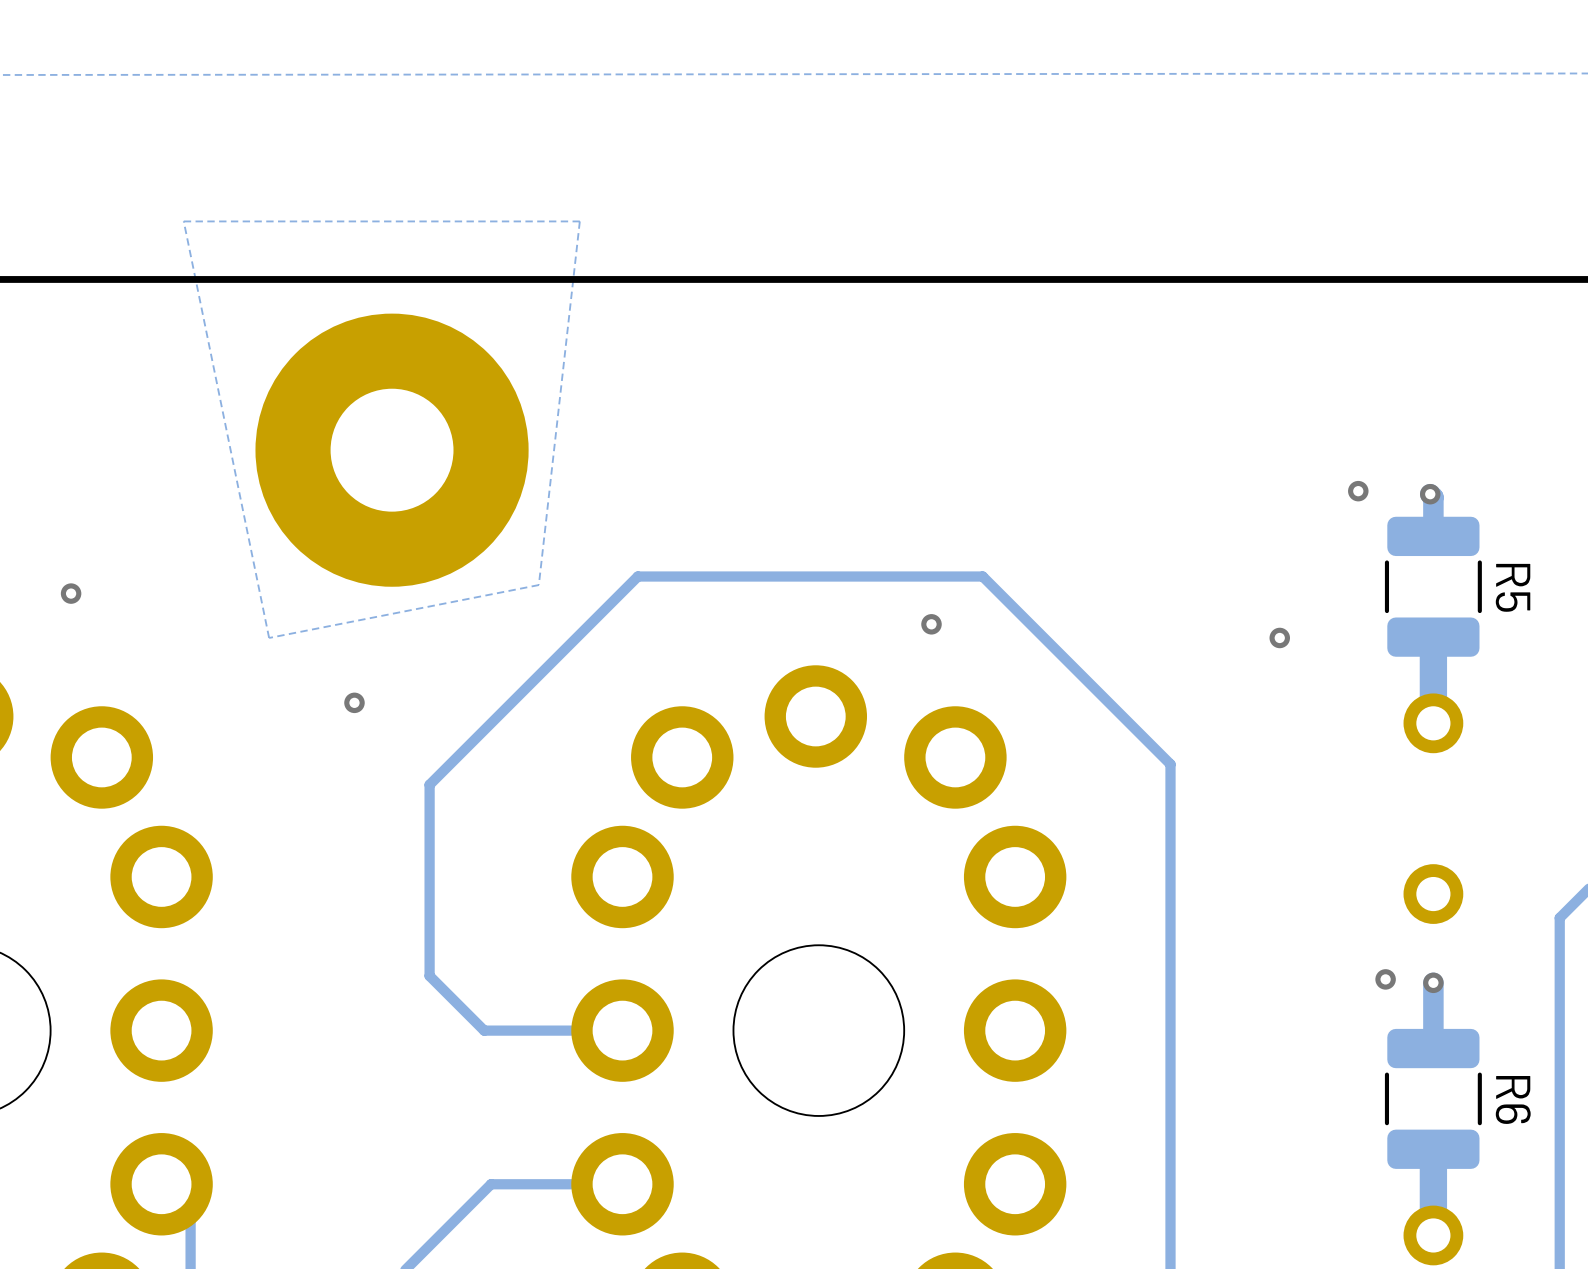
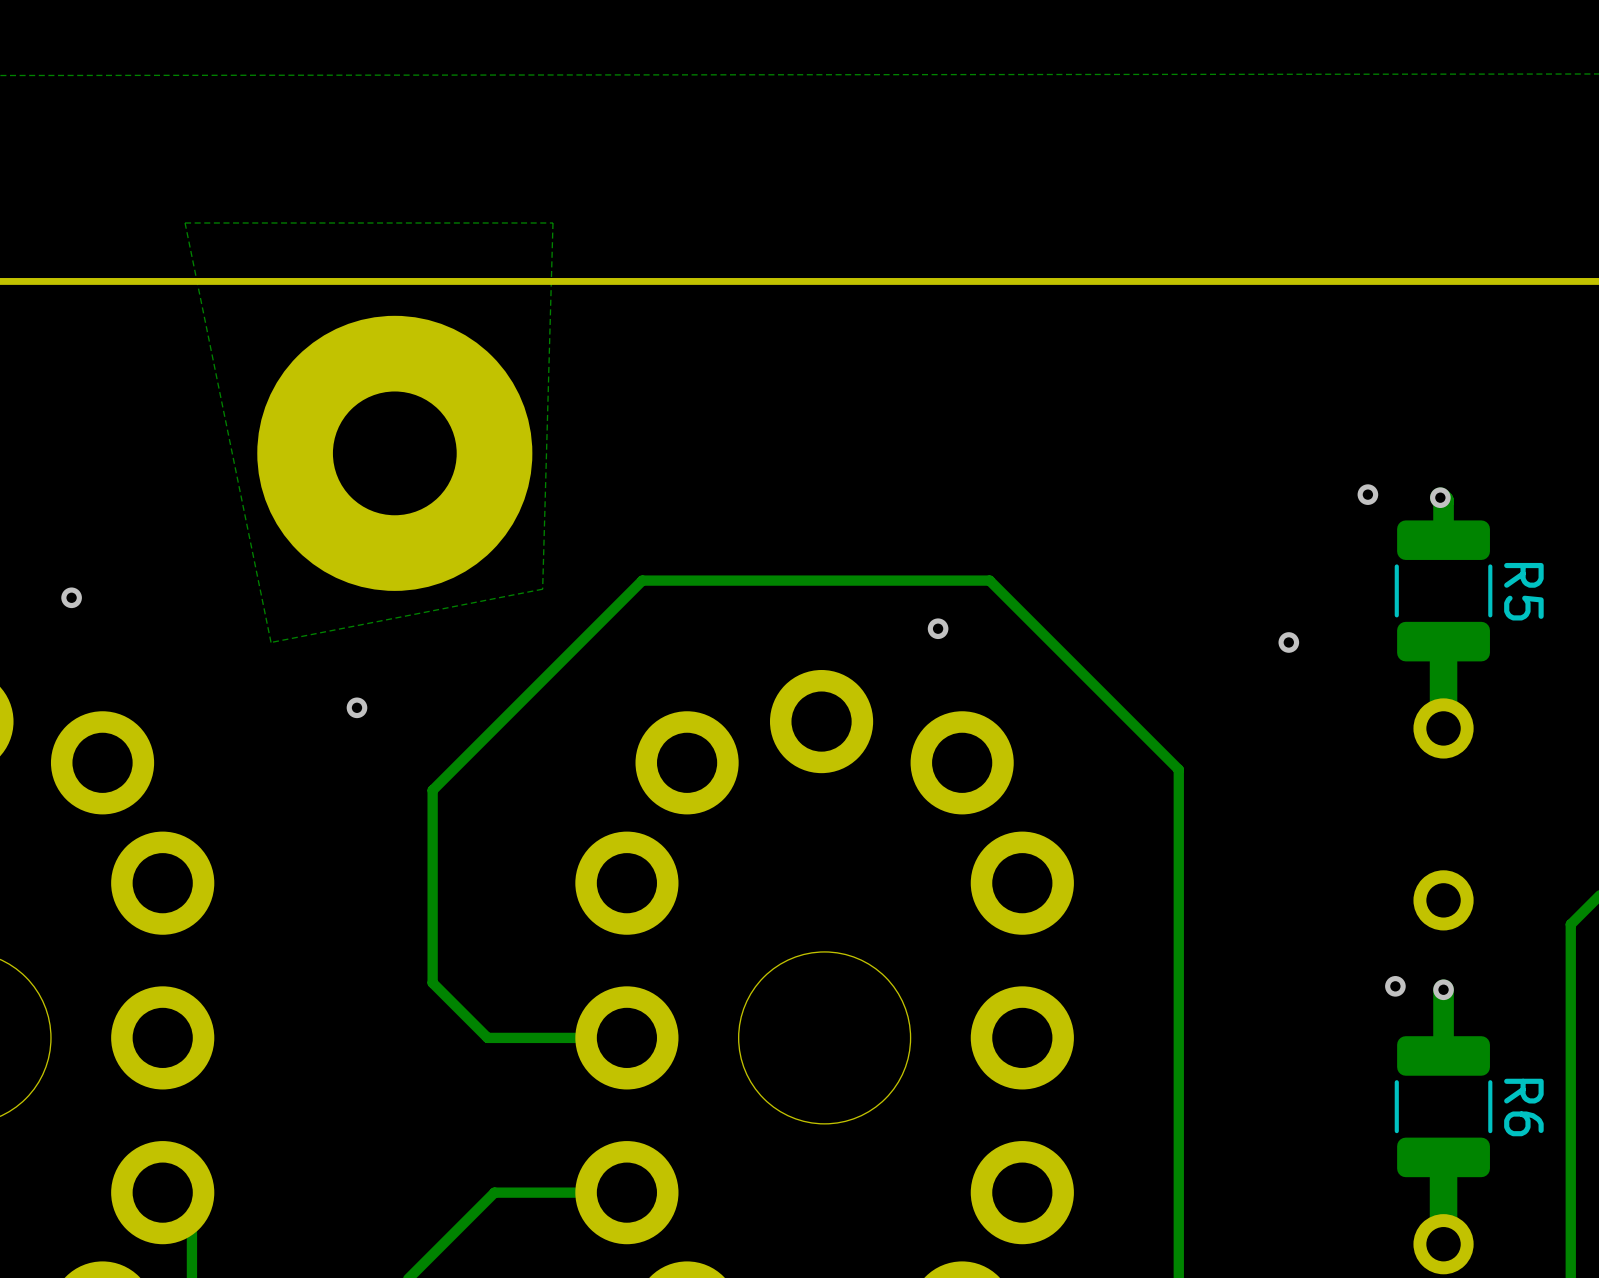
zone outline: (549, 221) (579, 221) (538, 585) -> (552, 222) (542, 589)

